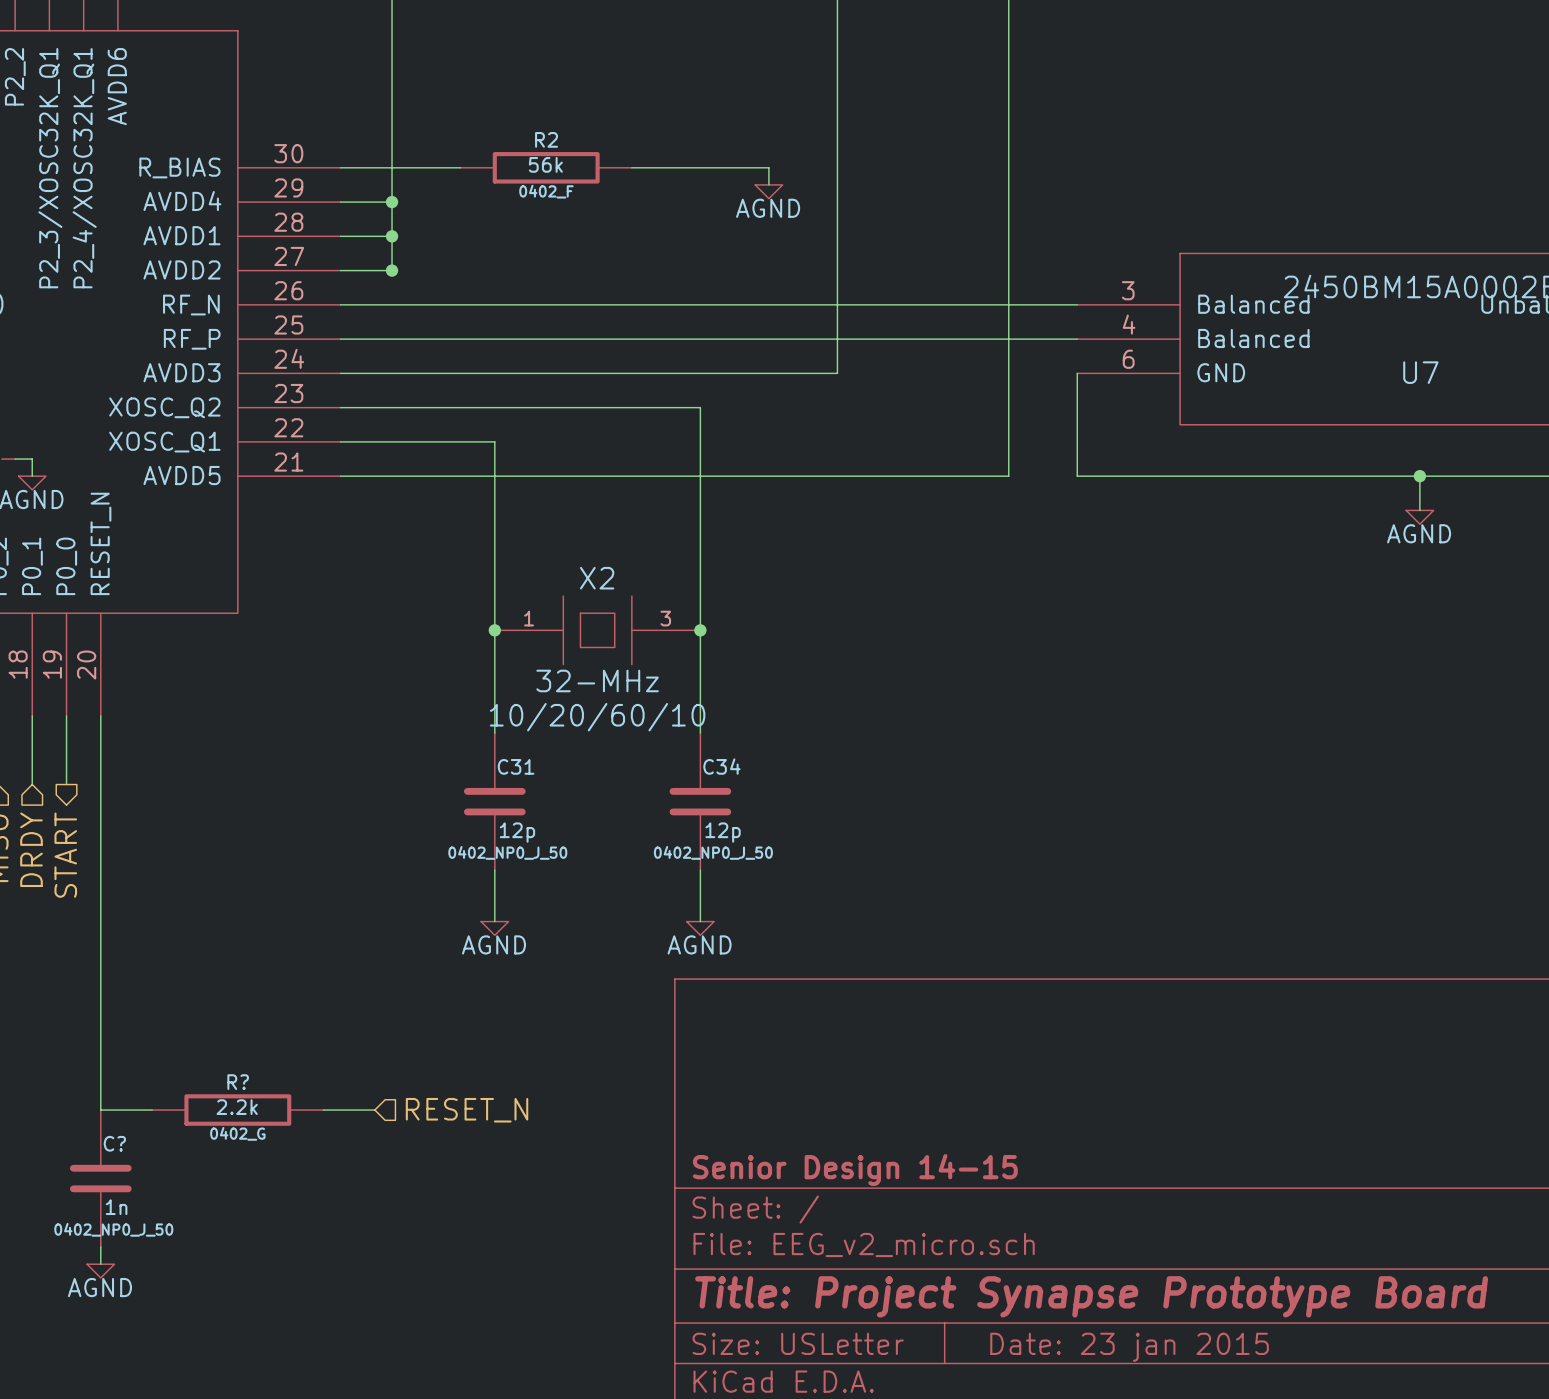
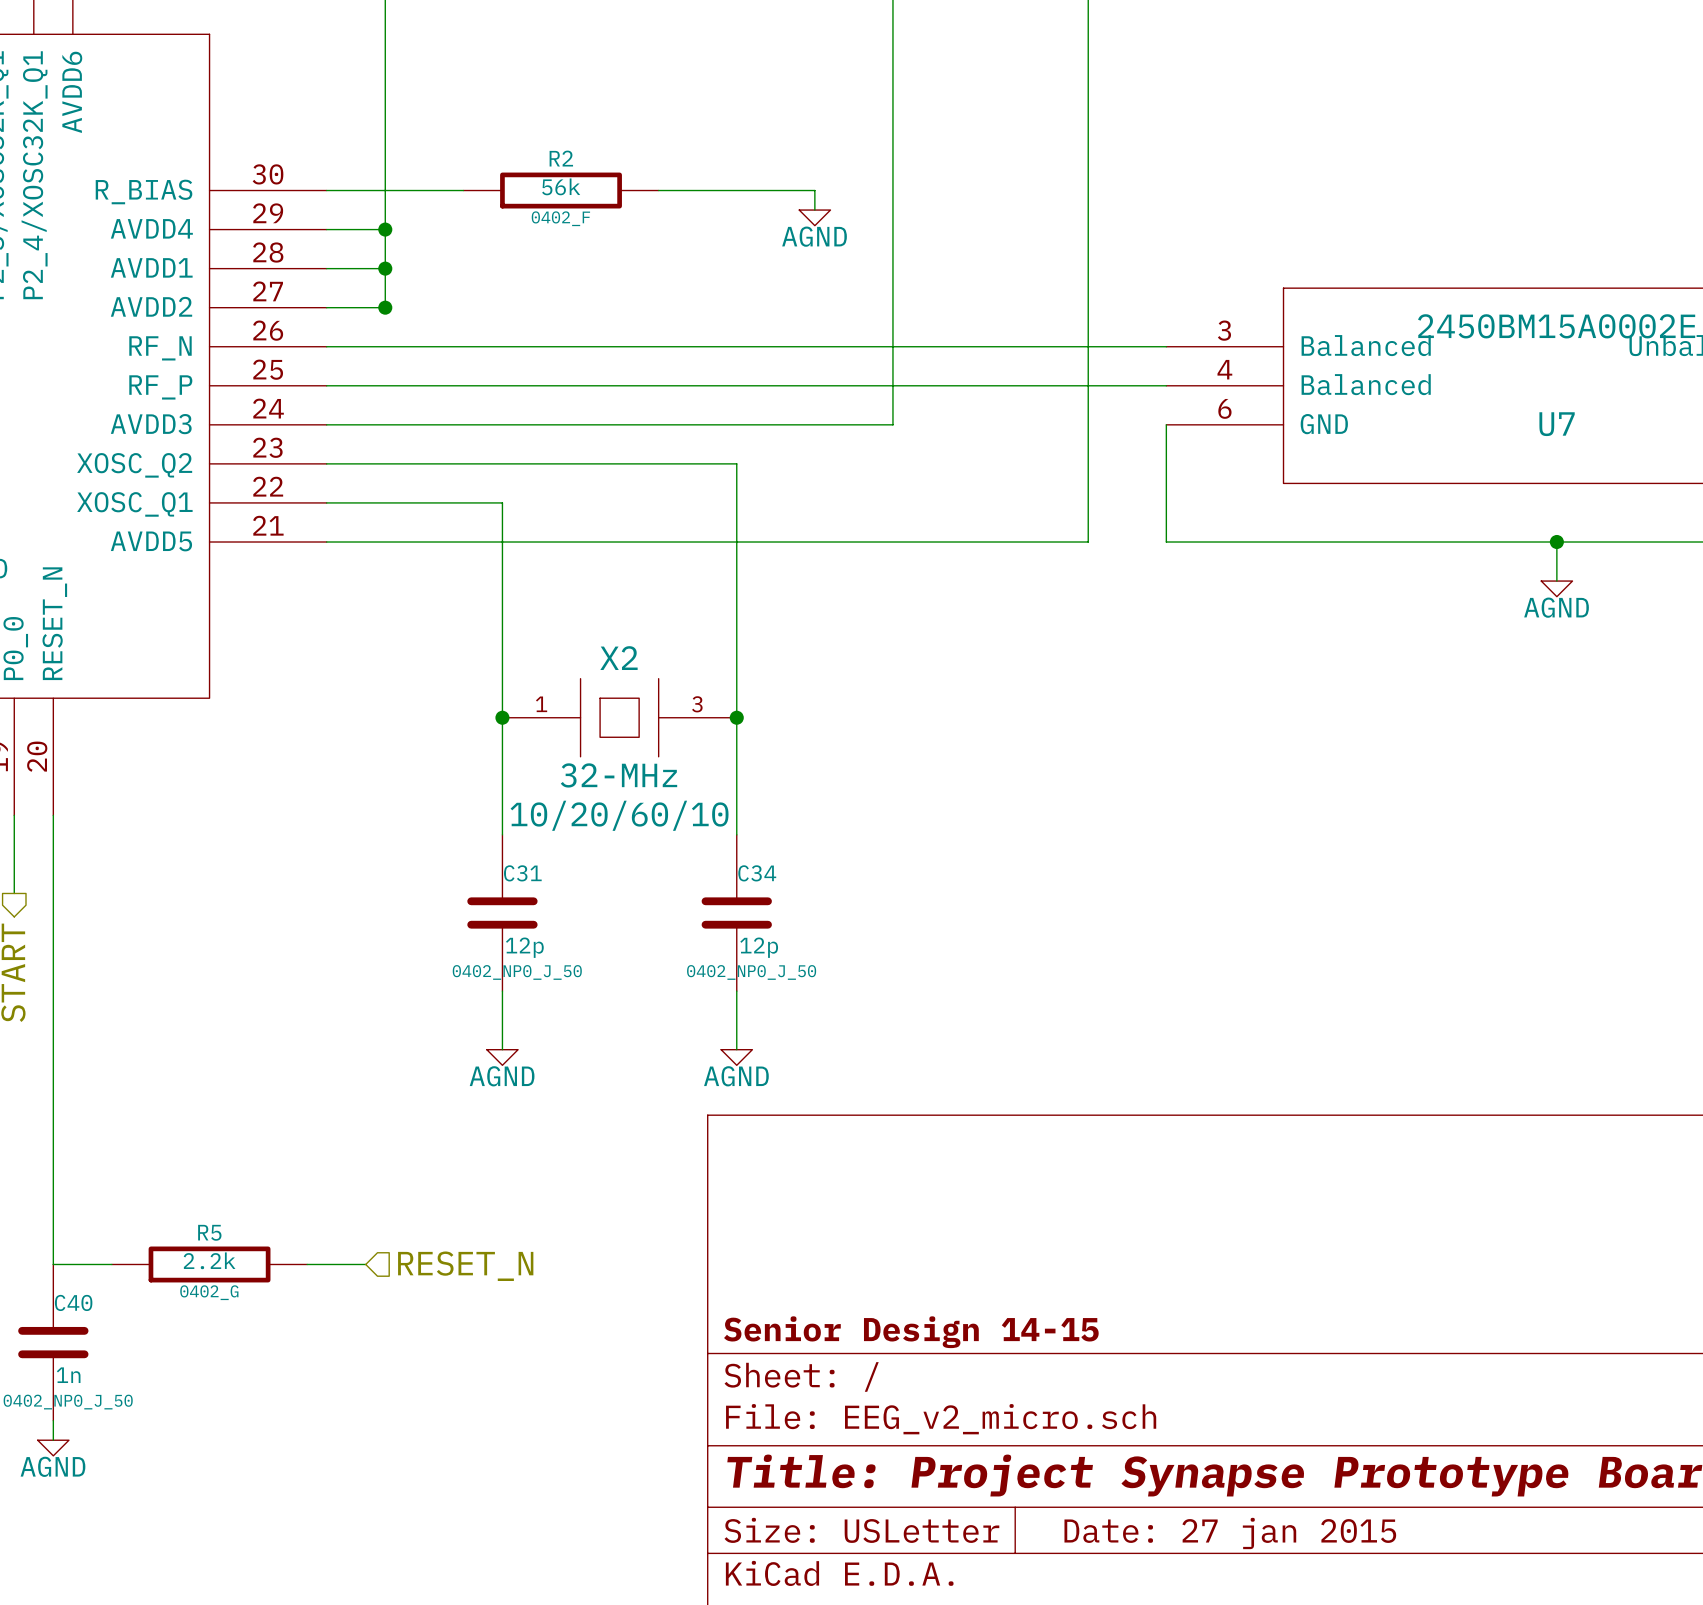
R? name: R? (238, 1082) -> R5 (209, 1232)
C? name: C? (114, 1143) -> C40 (73, 1302)
title block: Date: 23 jan 2015 (1129, 1347) -> Date: 27 jan 2015 (1230, 1533)

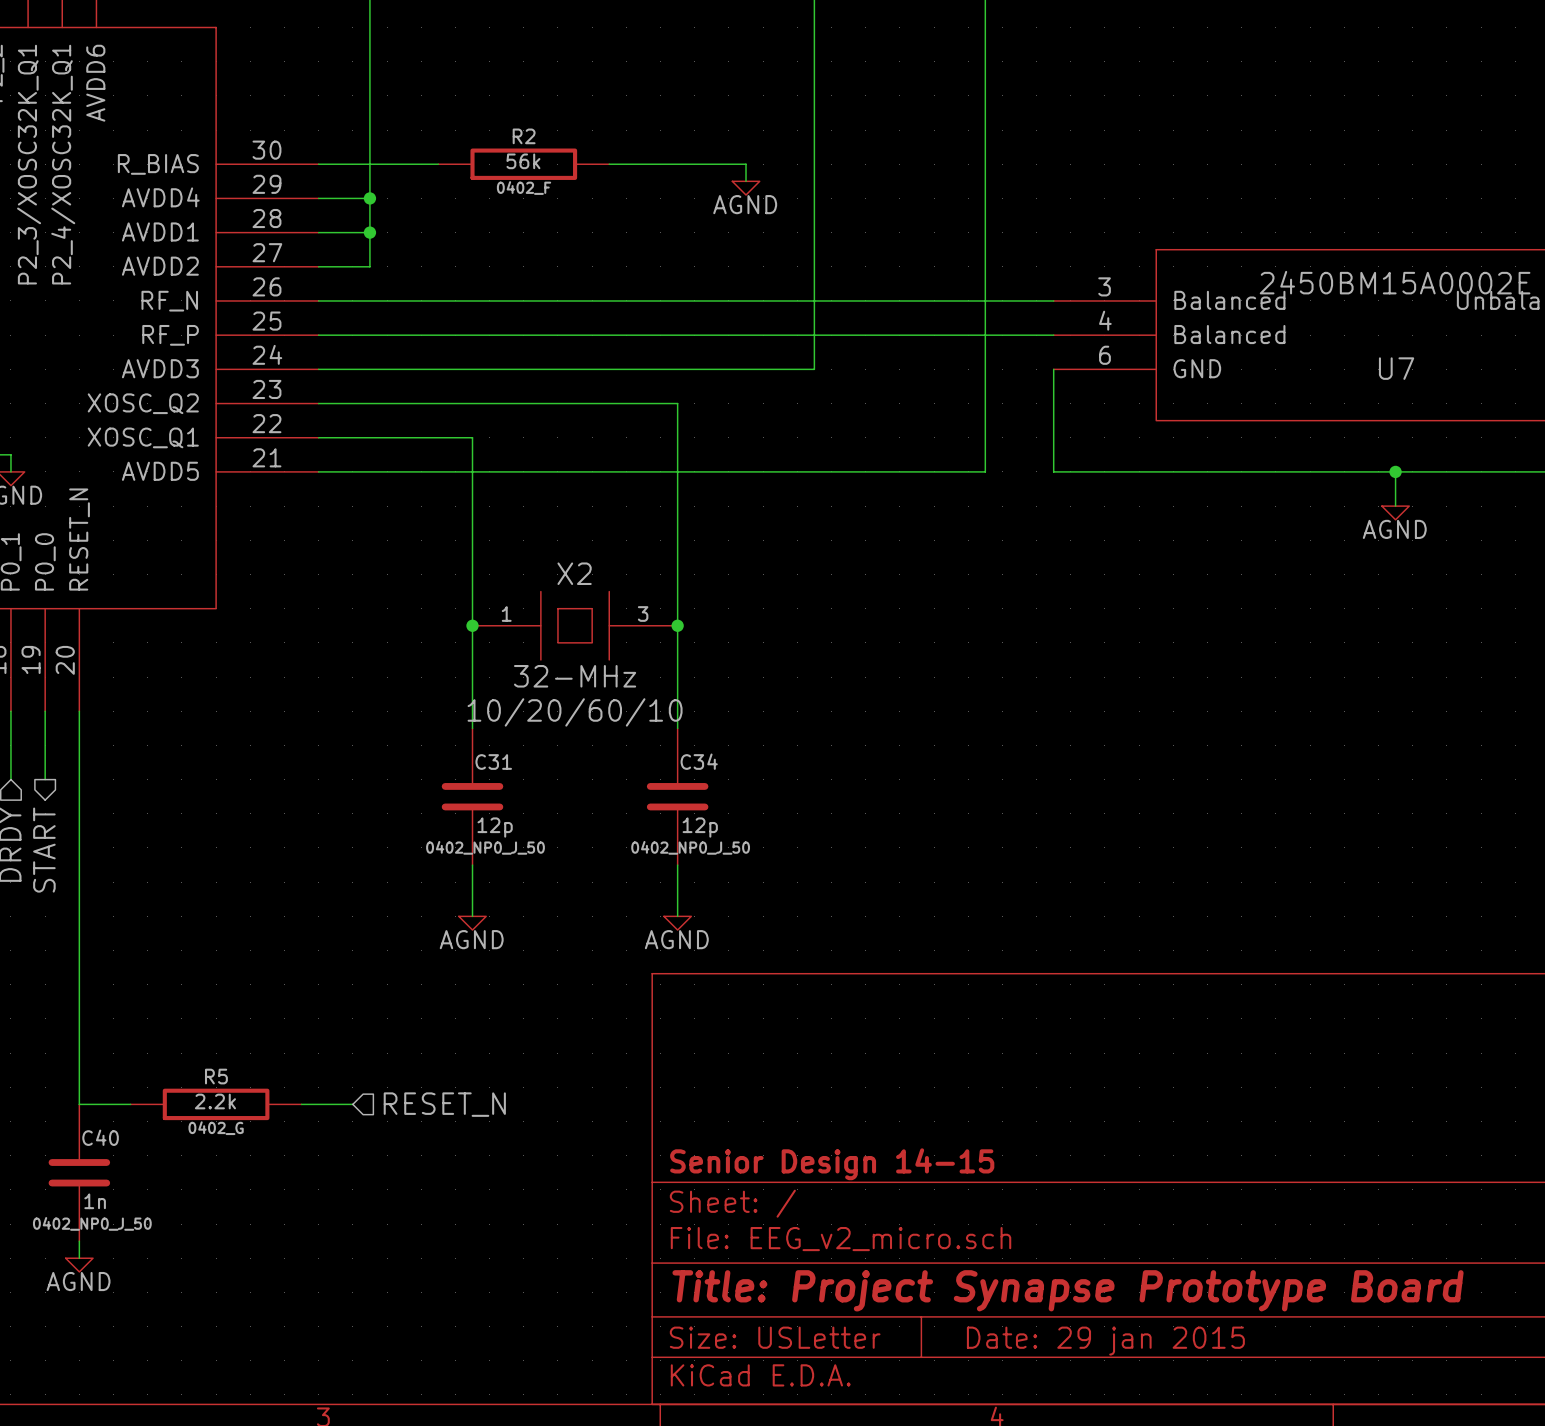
junction: (385, 307) -> none
title block: Date: 27 jan 2015 (1230, 1533) -> Date: 29 jan 2015 (1105, 1341)

